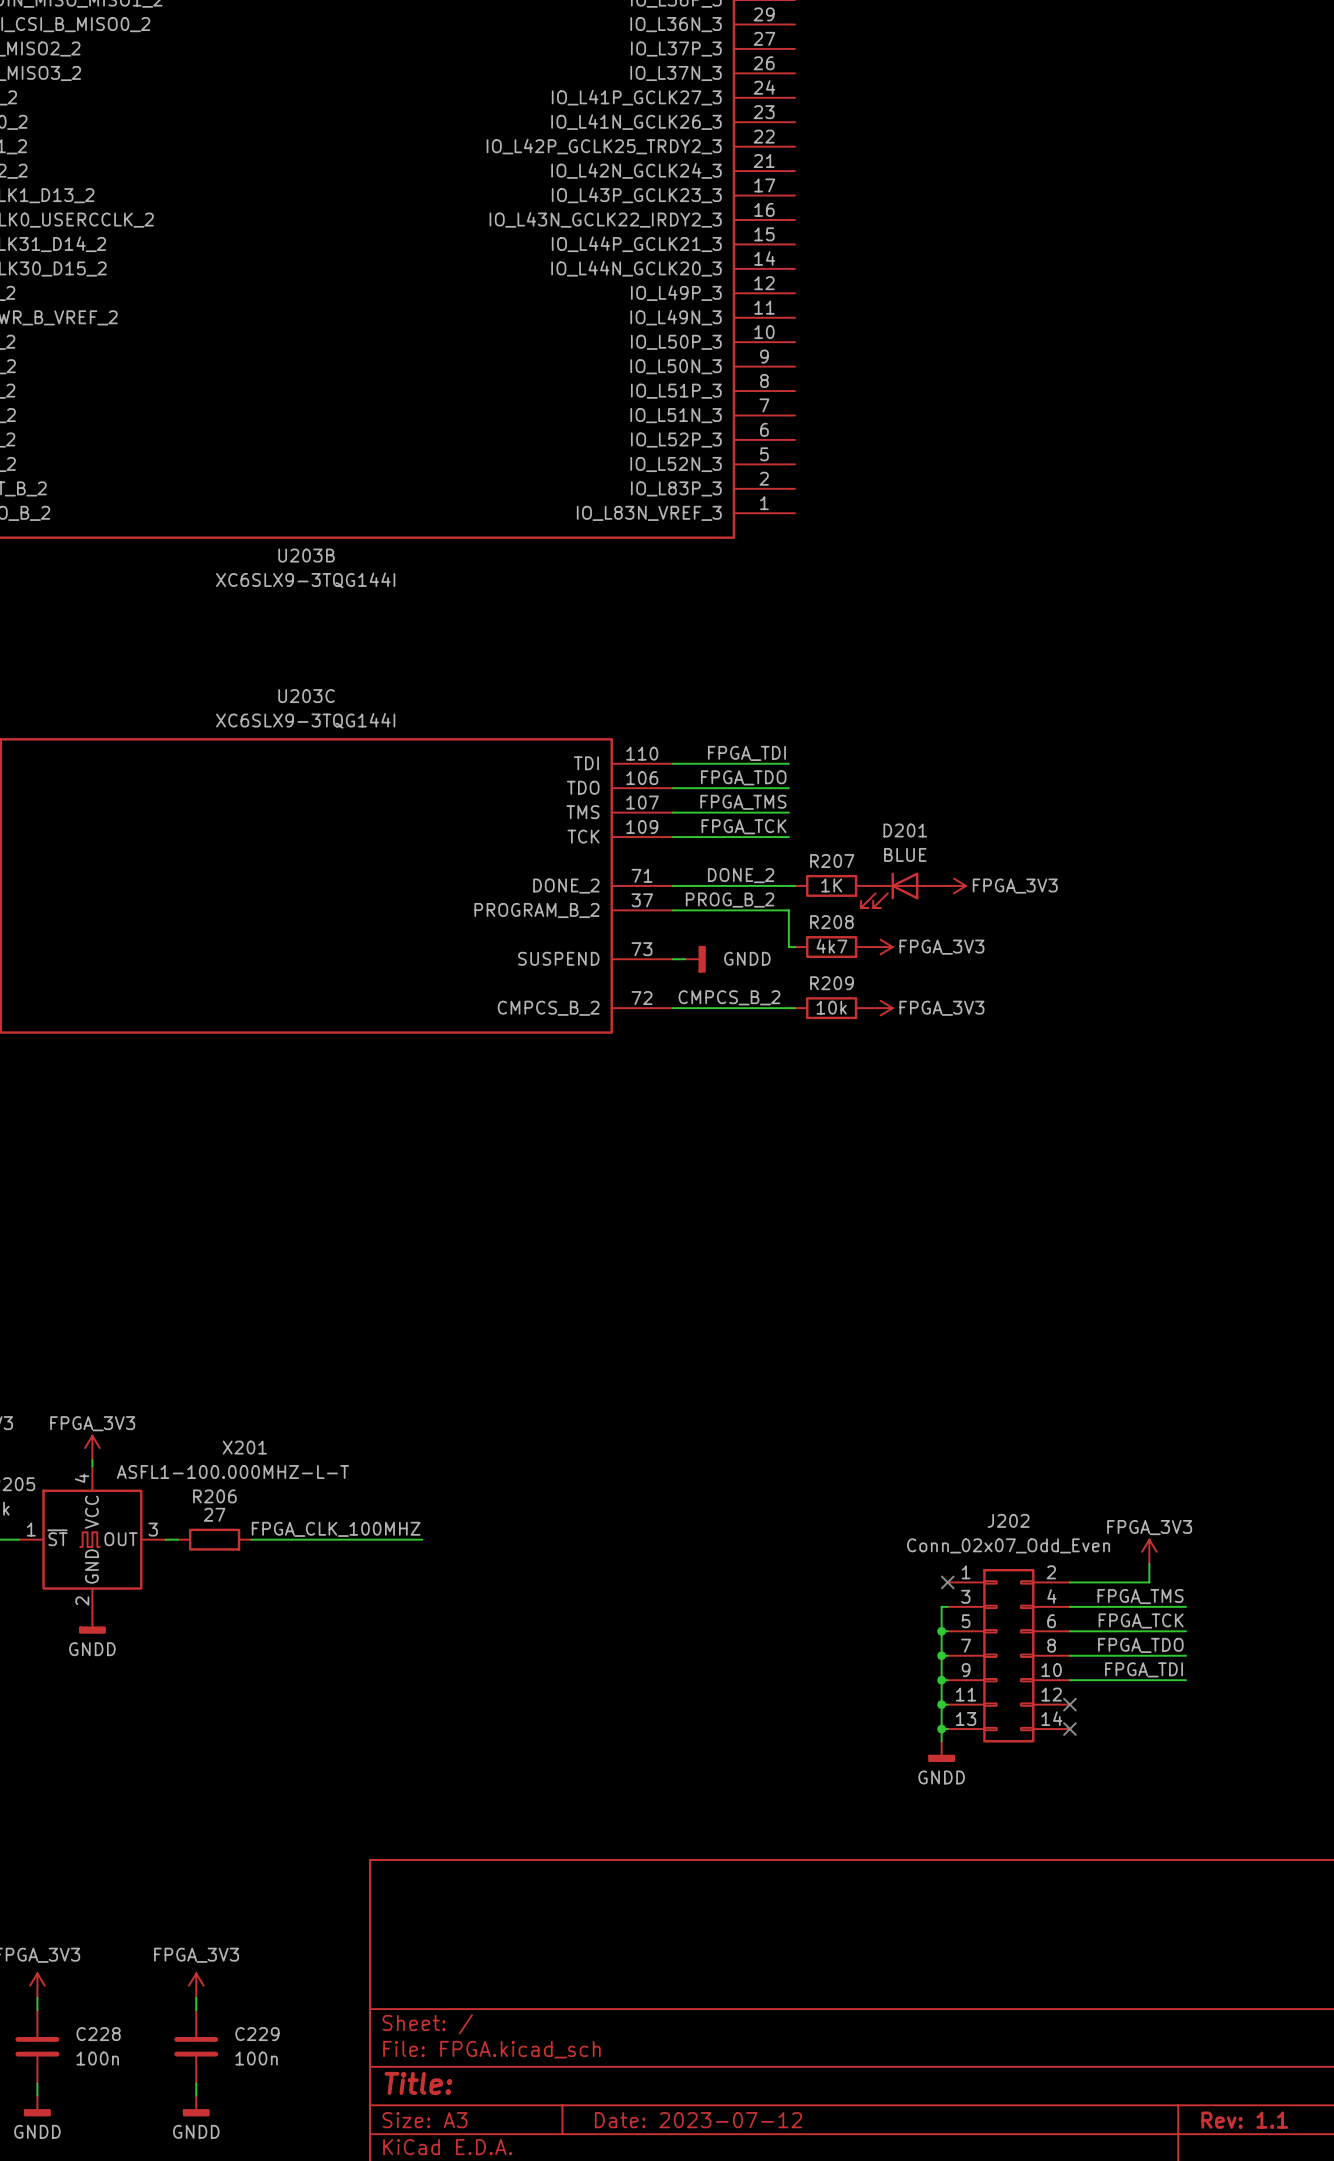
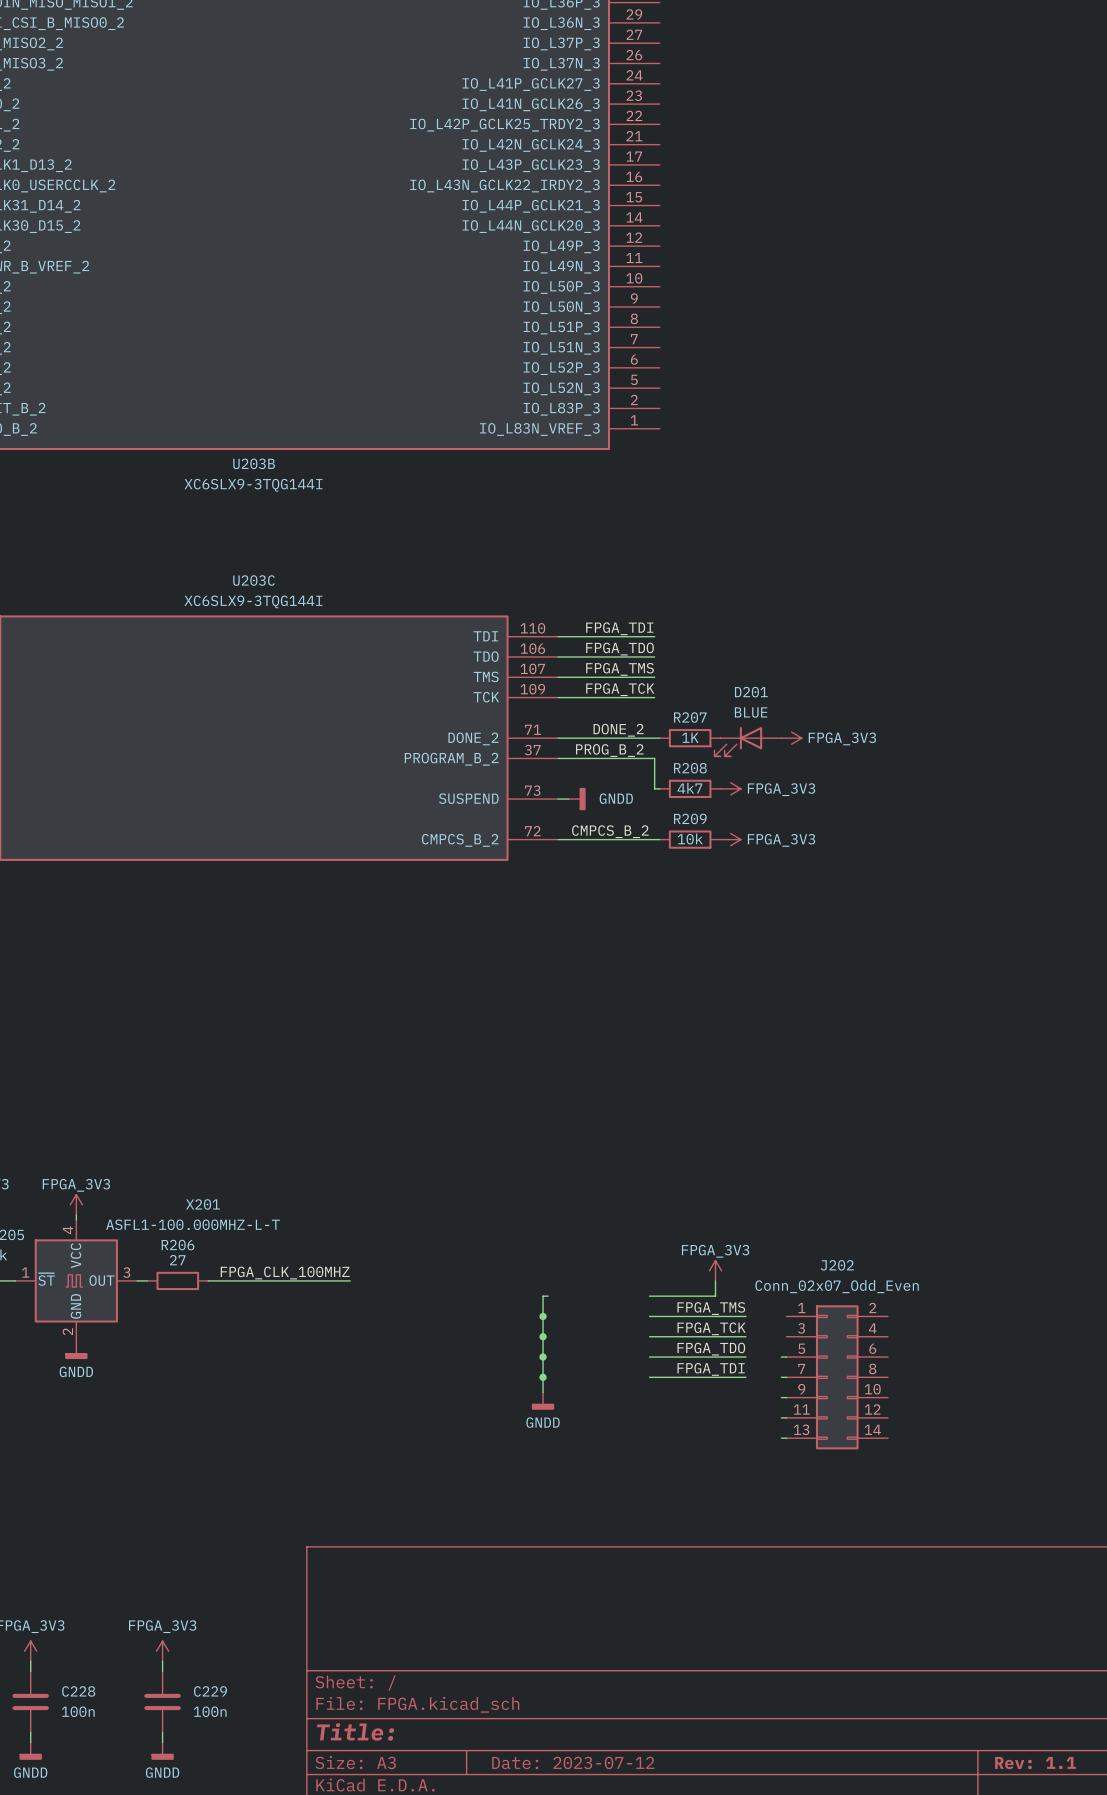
power symbol: none -> FPGA_3V3 (715, 1270)
wire: none -> (715, 1280) (715, 1296) (649, 1296)
power symbol: FPGA_3V3 (1149, 1551) -> none
wire: none -> (548, 1296) (543, 1296) (543, 1392)
wire: (1149, 1564) (1149, 1582) (1069, 1582) -> none
label: none -> FPGA_TMS (711, 1308)
junction: none -> (543, 1316)
wire: none -> (649, 1316) (745, 1316)
no-connect mark: (947, 1582) -> none
label: none -> FPGA_TCK (711, 1328)
label: FPGA_TMS (1140, 1596) -> none
junction: none -> (543, 1336)
wire: none -> (649, 1336) (745, 1336)
wire: (947, 1606) (941, 1606) (941, 1741) -> none
wire: (1069, 1606) (1186, 1606) -> none
label: none -> FPGA_TDO (711, 1349)
label: FPGA_TCK (1141, 1620) -> none
junction: none -> (543, 1357)
wire: none -> (649, 1357) (745, 1357)
junction: (941, 1631) -> none
wire: (1069, 1631) (1186, 1631) -> none
label: none -> FPGA_TDI (711, 1369)
label: FPGA_TDO (1140, 1645) -> none
junction: none -> (543, 1377)
wire: none -> (649, 1377) (745, 1377)
junction: (941, 1655) -> none
wire: (1069, 1655) (1186, 1655) -> none
label: FPGA_TDI (1144, 1669) -> none
junction: (941, 1680) -> none
wire: (1069, 1680) (1186, 1680) -> none
power symbol: none -> GNDD (543, 1401)
junction: (941, 1704) -> none
no-connect mark: (1069, 1704) -> none
junction: (941, 1729) -> none
no-connect mark: (1069, 1729) -> none
power symbol: GNDD (941, 1751) -> none

